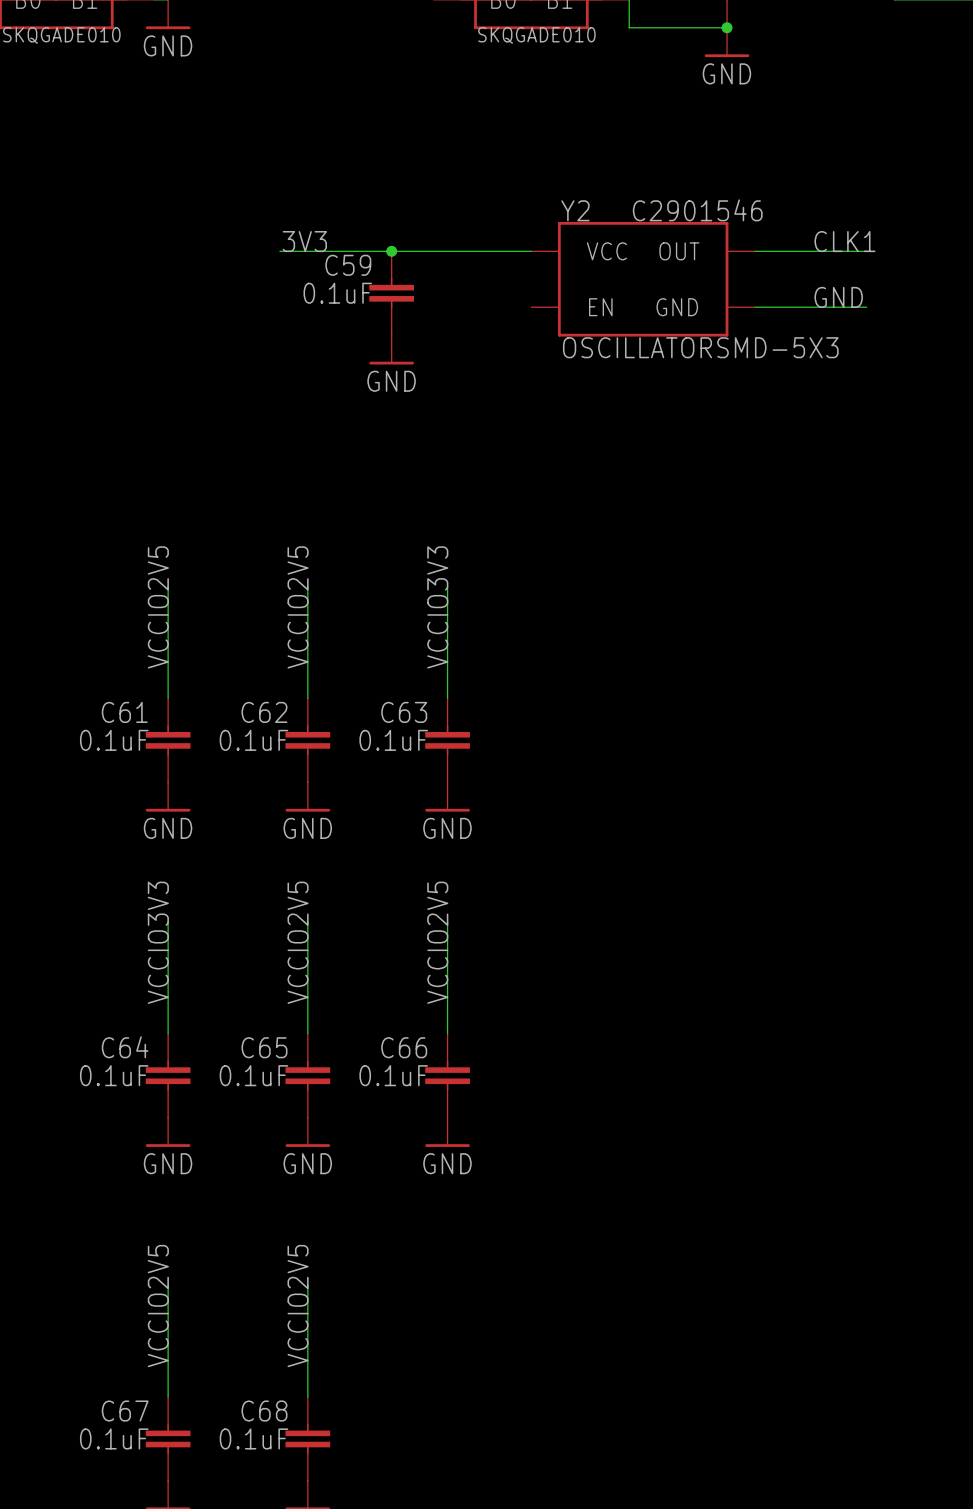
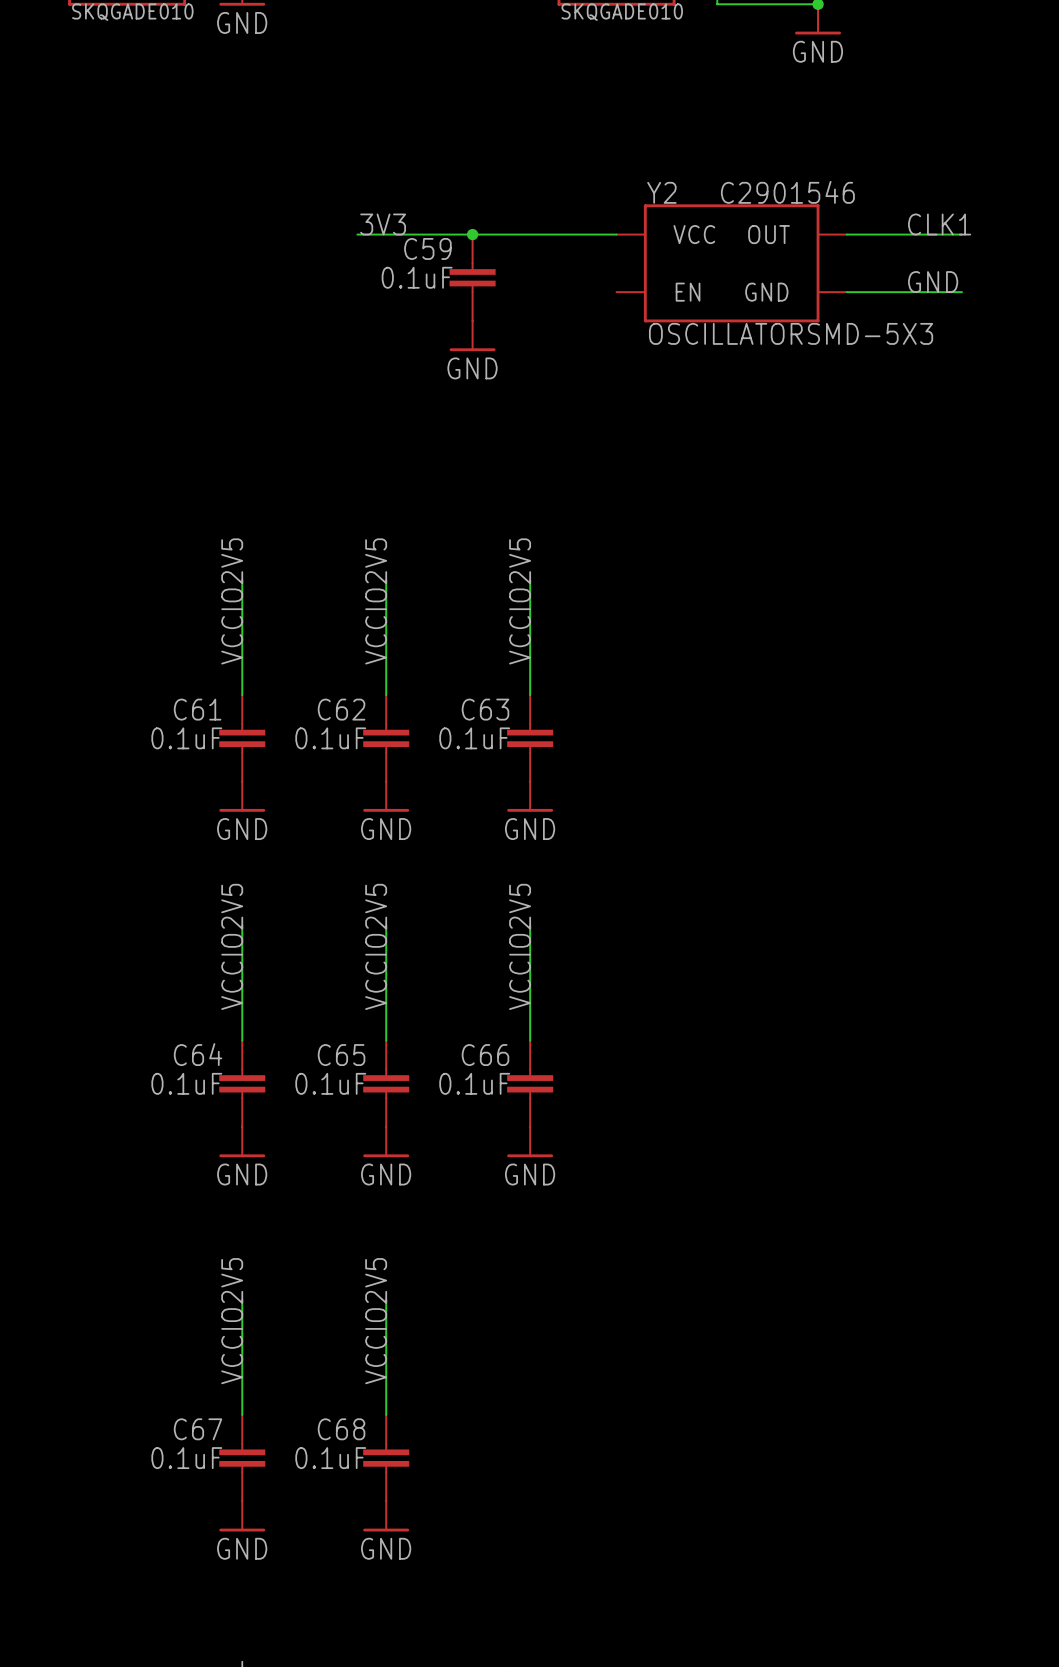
label: VCCIO3V3 (437, 607) -> VCCIO2V5 (520, 601)
label: VCCIO3V3 (158, 942) -> VCCIO2V5 (232, 946)

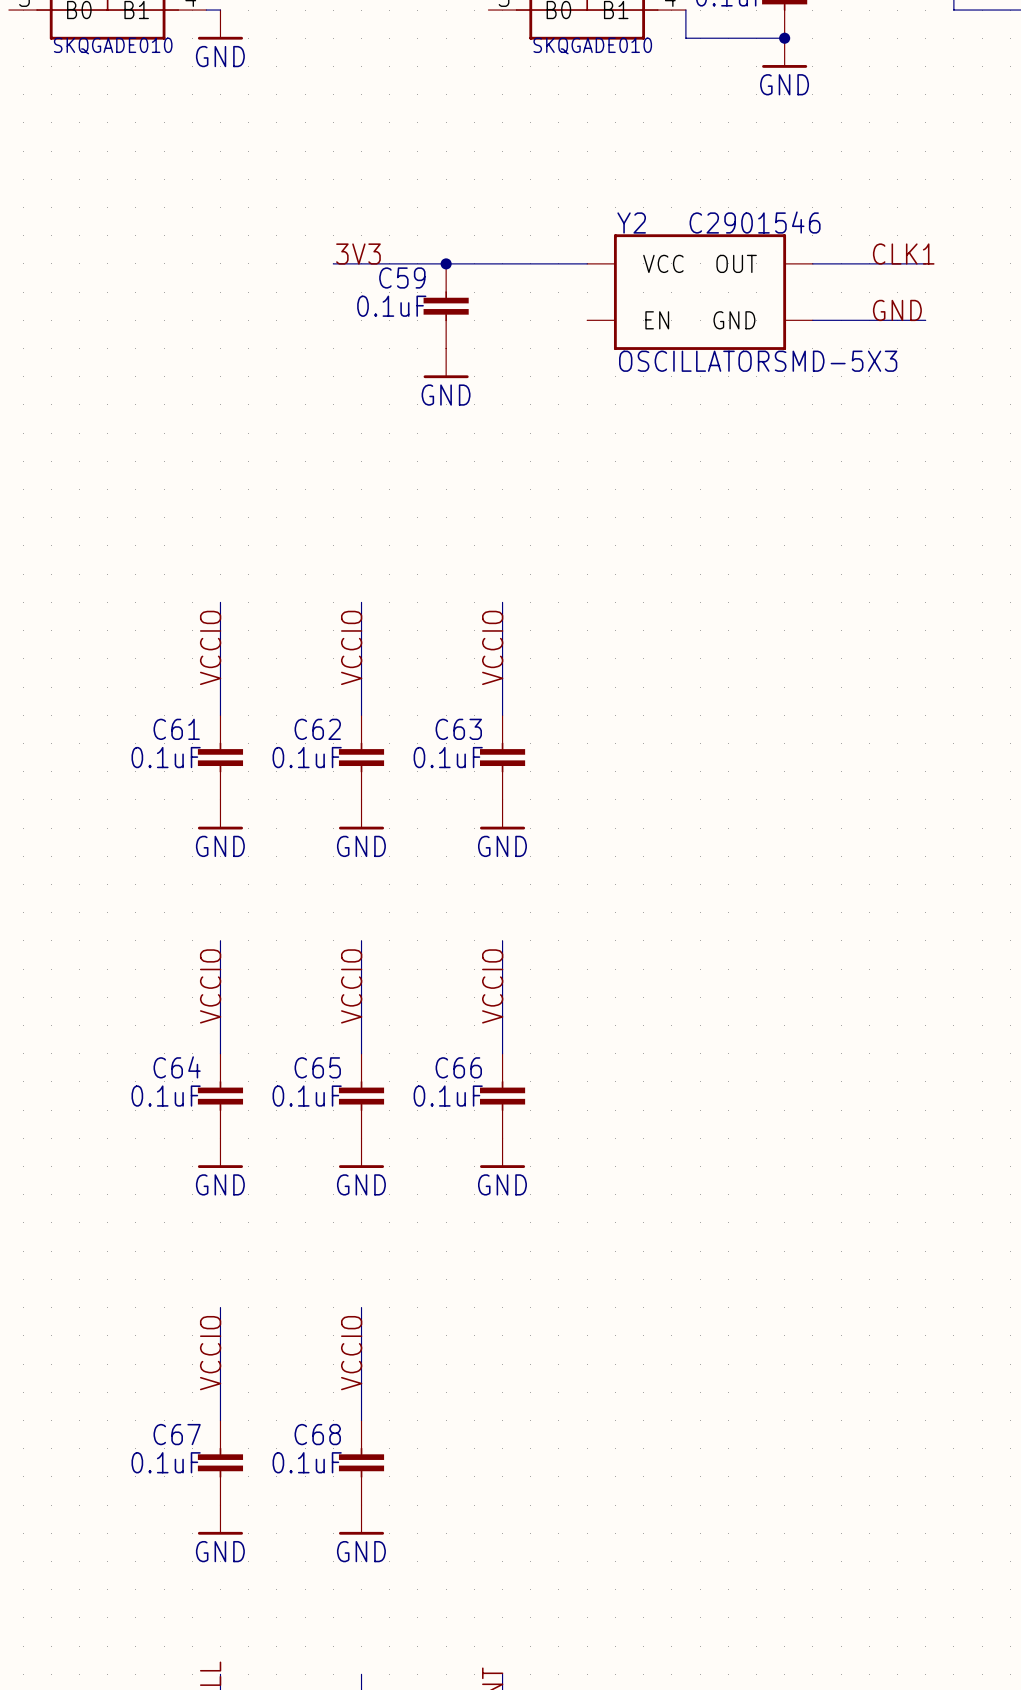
label: VCCIO2V5 (232, 601) -> VCCIO (210, 647)
label: VCCIO2V5 (376, 601) -> VCCIO (351, 647)
label: VCCIO2V5 (520, 601) -> VCCIO (492, 647)
label: VCCIO2V5 (232, 946) -> VCCIO (210, 986)
label: VCCIO2V5 (376, 946) -> VCCIO (351, 986)
label: VCCIO2V5 (520, 946) -> VCCIO (492, 986)
label: VCCIO2V5 (232, 1321) -> VCCIO (210, 1353)
label: VCCIO2V5 (376, 1321) -> VCCIO (351, 1353)

